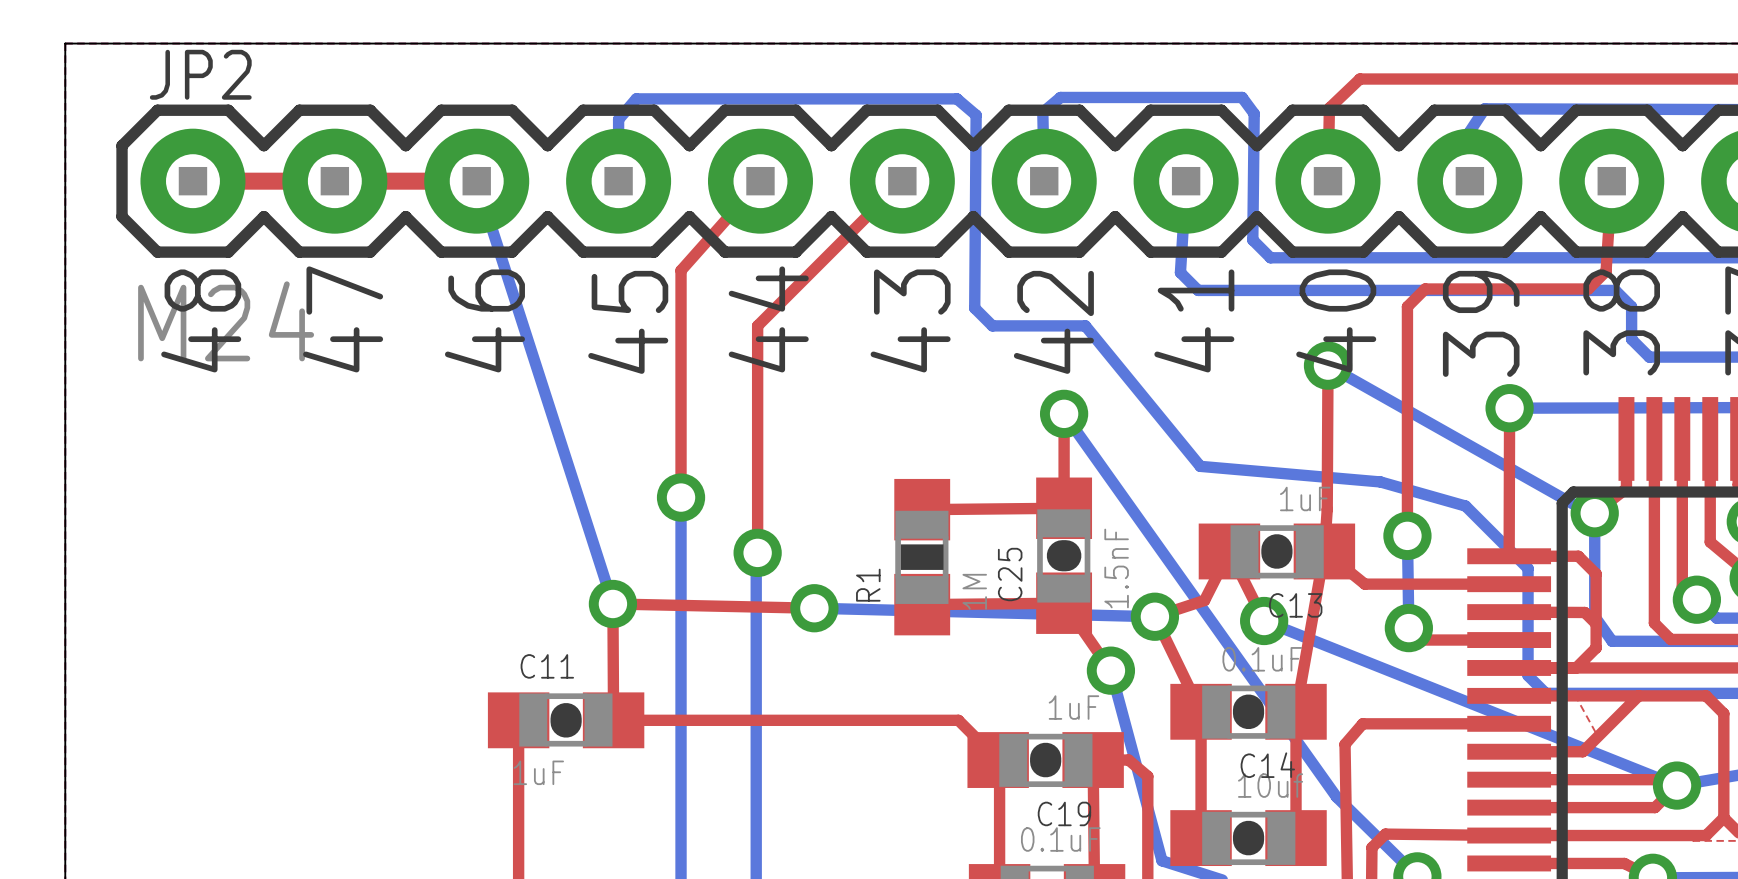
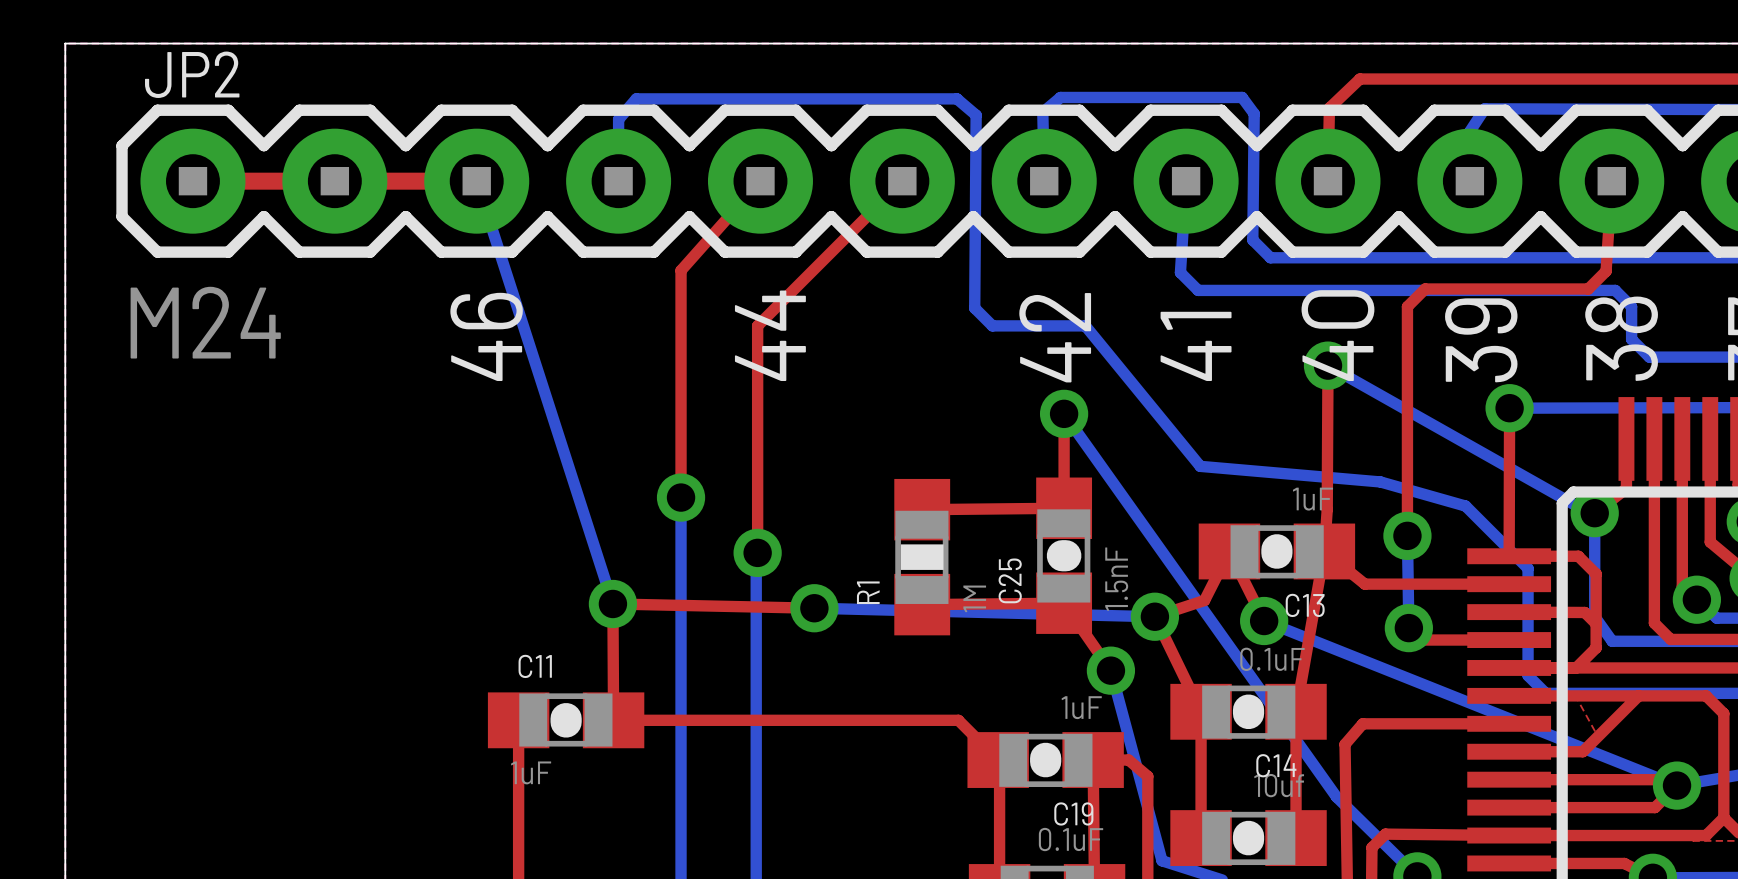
text: 47 (343, 319) -> none
text: 48 (201, 320) -> none
text: 43 (910, 320) -> none
text: 45 (628, 322) -> none

